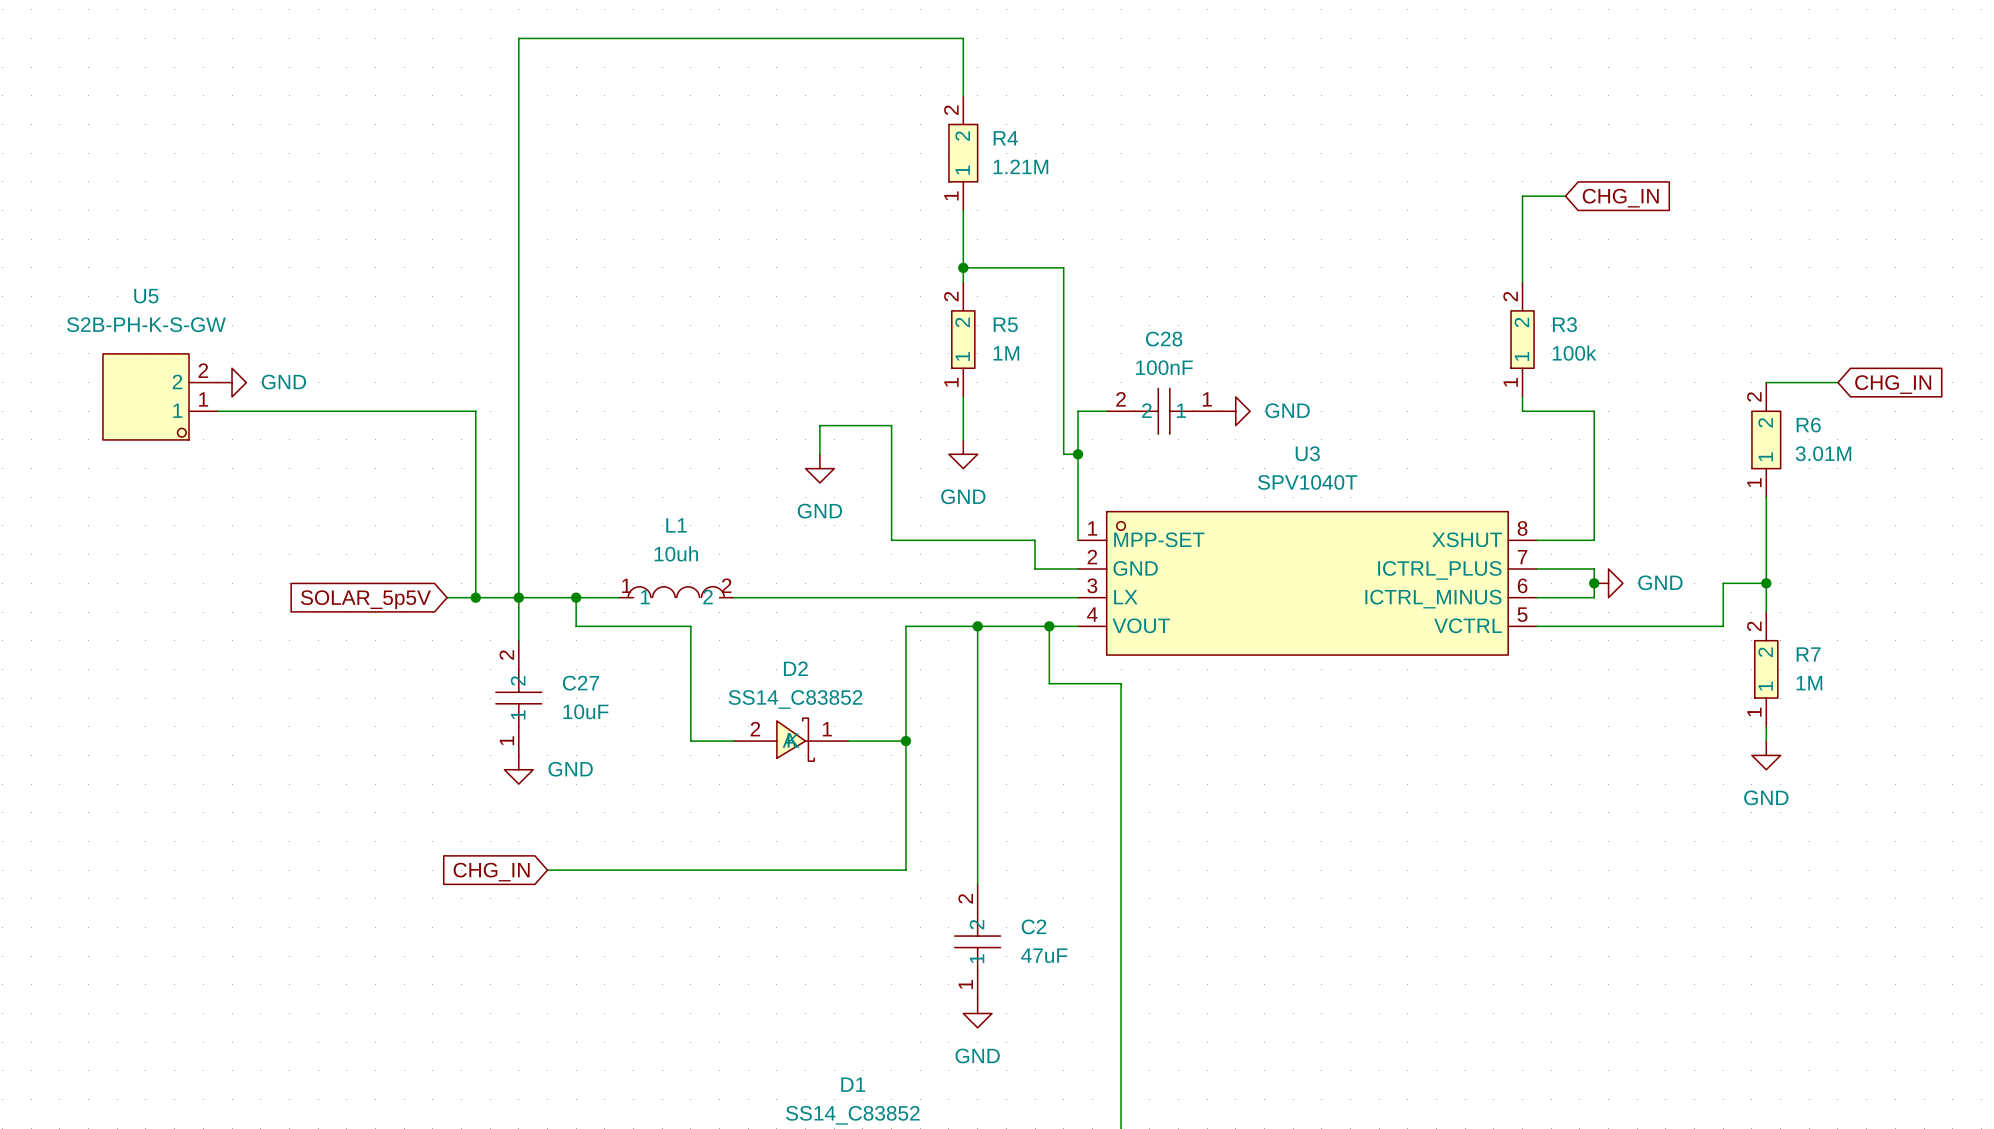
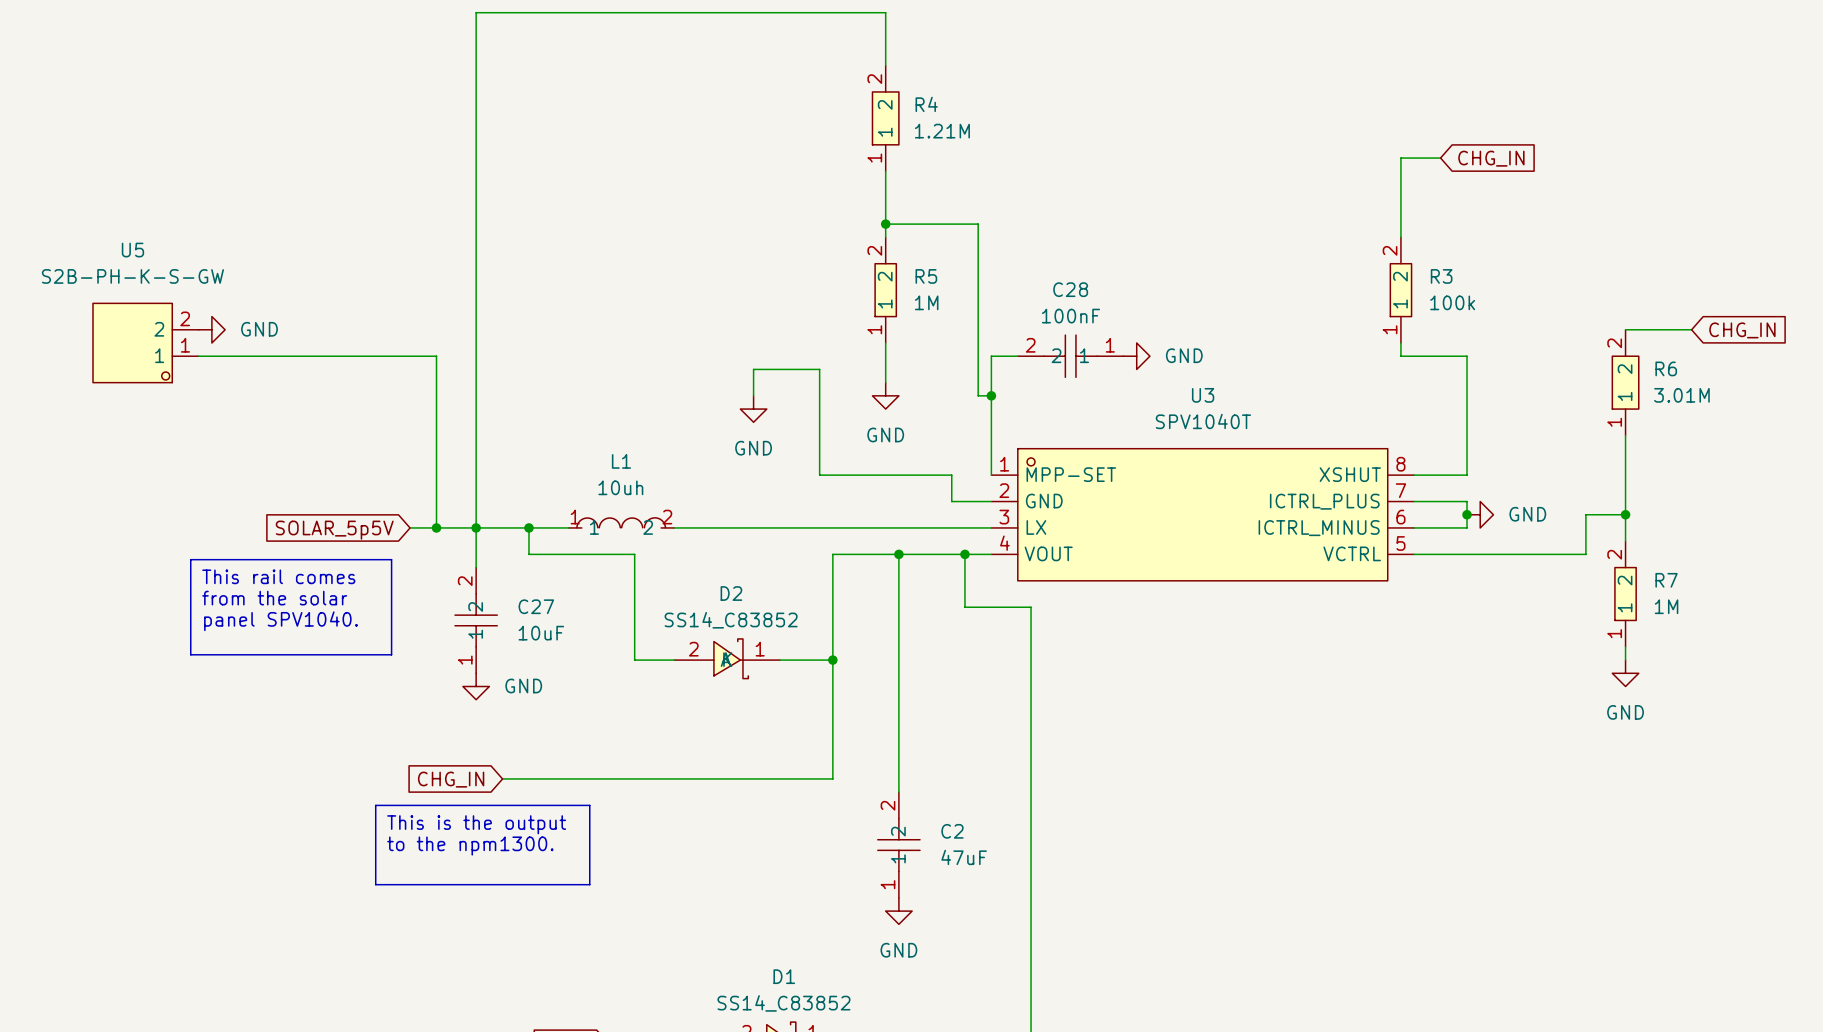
line: none -> (190, 559) (391, 559) (391, 654) (190, 654) (190, 559)
text: none -> This rail comes (278, 576)
text: none -> from the solar (274, 598)
text: none -> panel SPV1040. (280, 621)
line: none -> (375, 805) (589, 805) (589, 884) (375, 884) (375, 805)
text: none -> This is the output (476, 824)
text: none -> to the npm1300. (470, 846)

